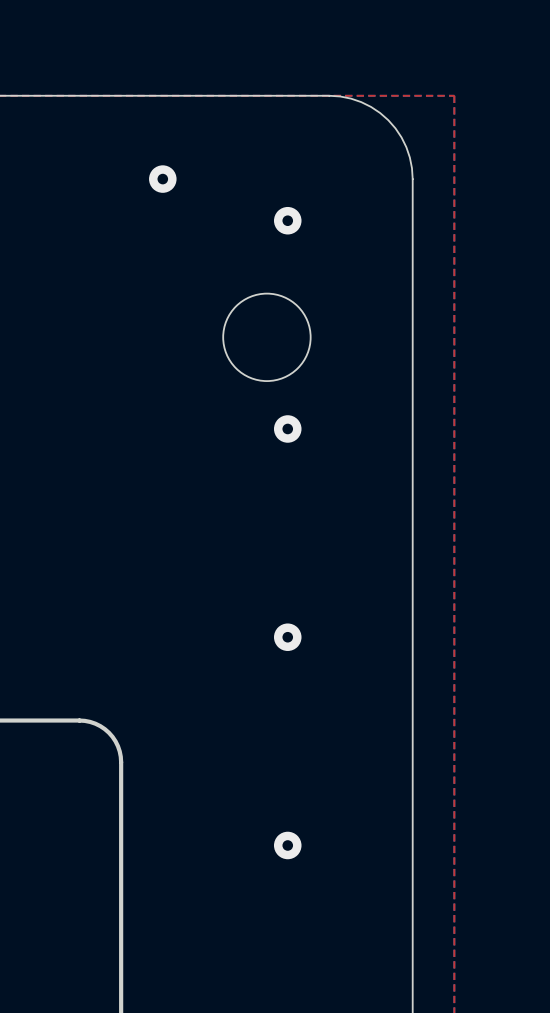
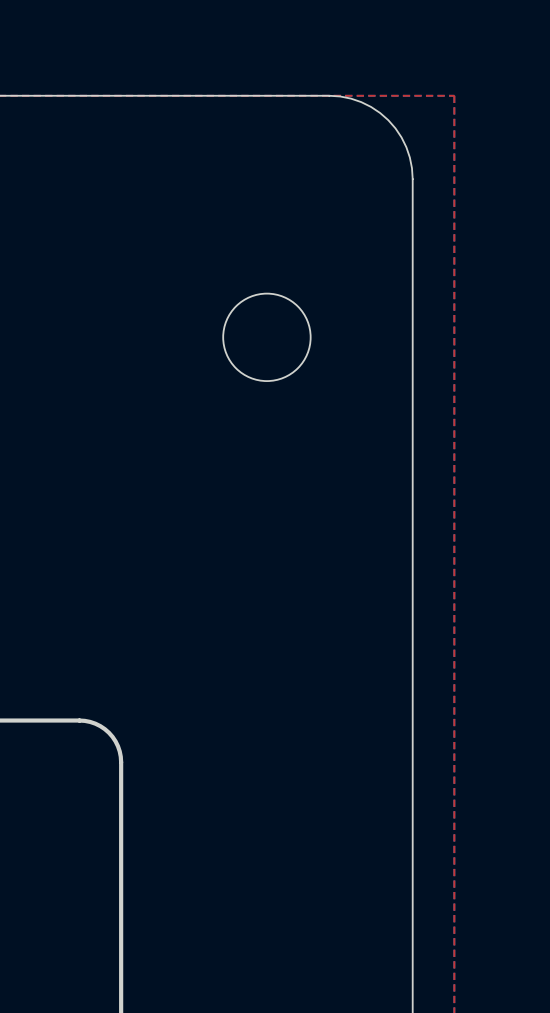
via: (162, 179) -> none
via: (287, 220) -> none
via: (287, 428) -> none
via: (287, 637) -> none
via: (287, 845) -> none

